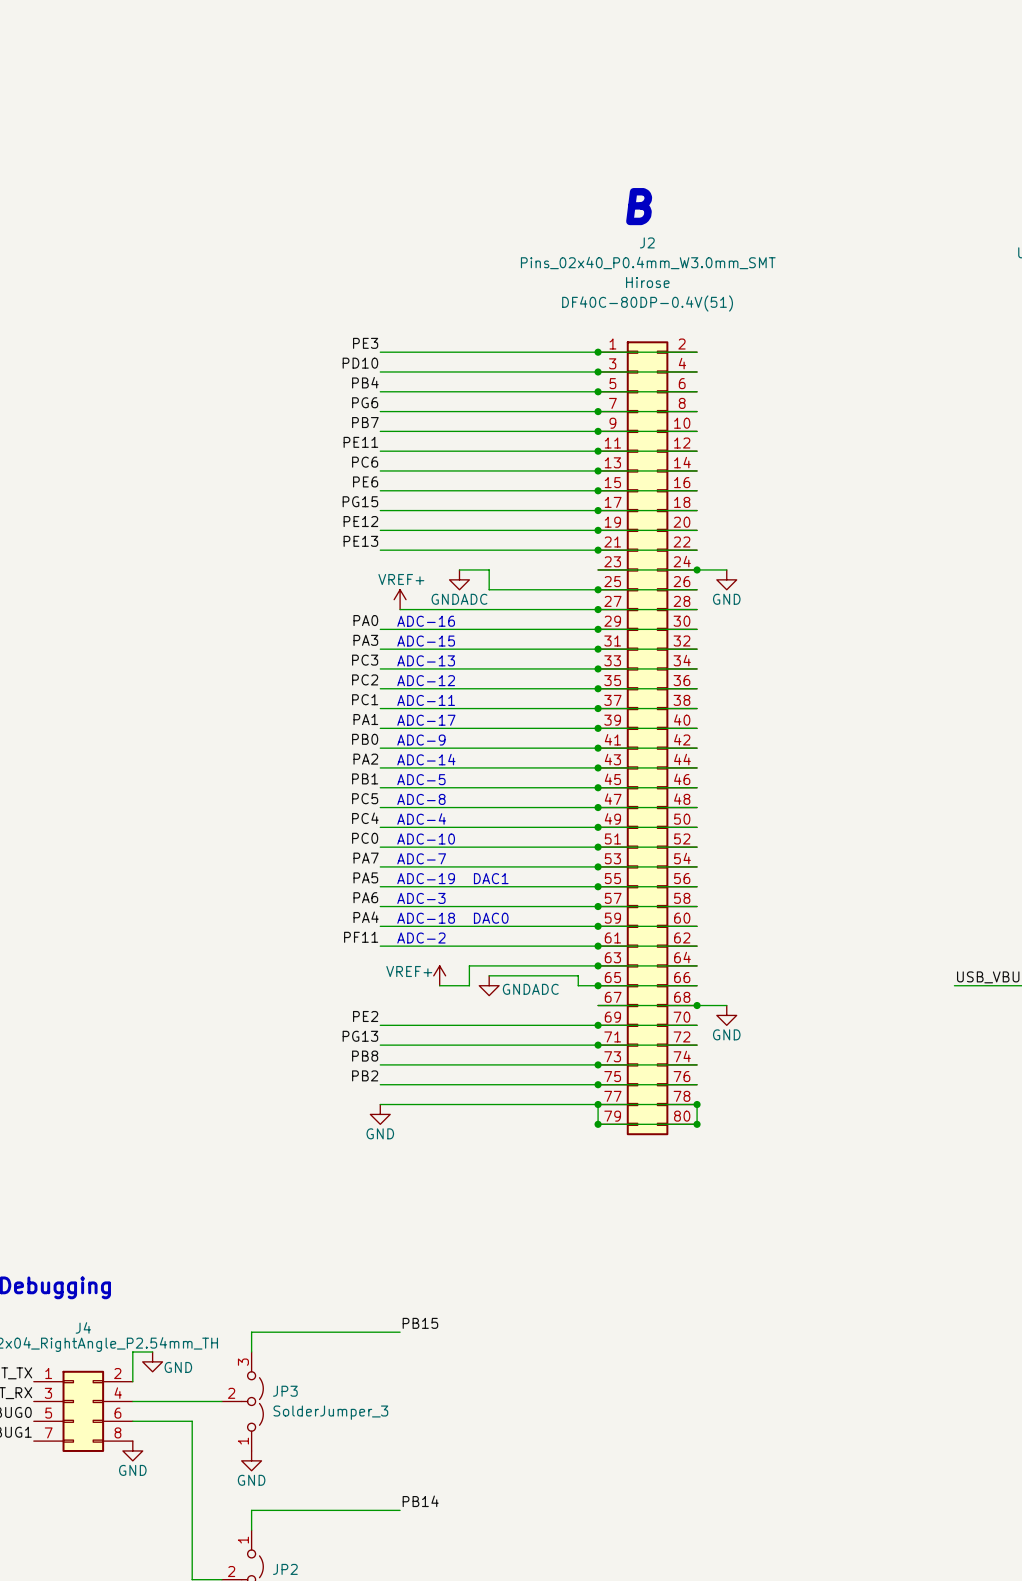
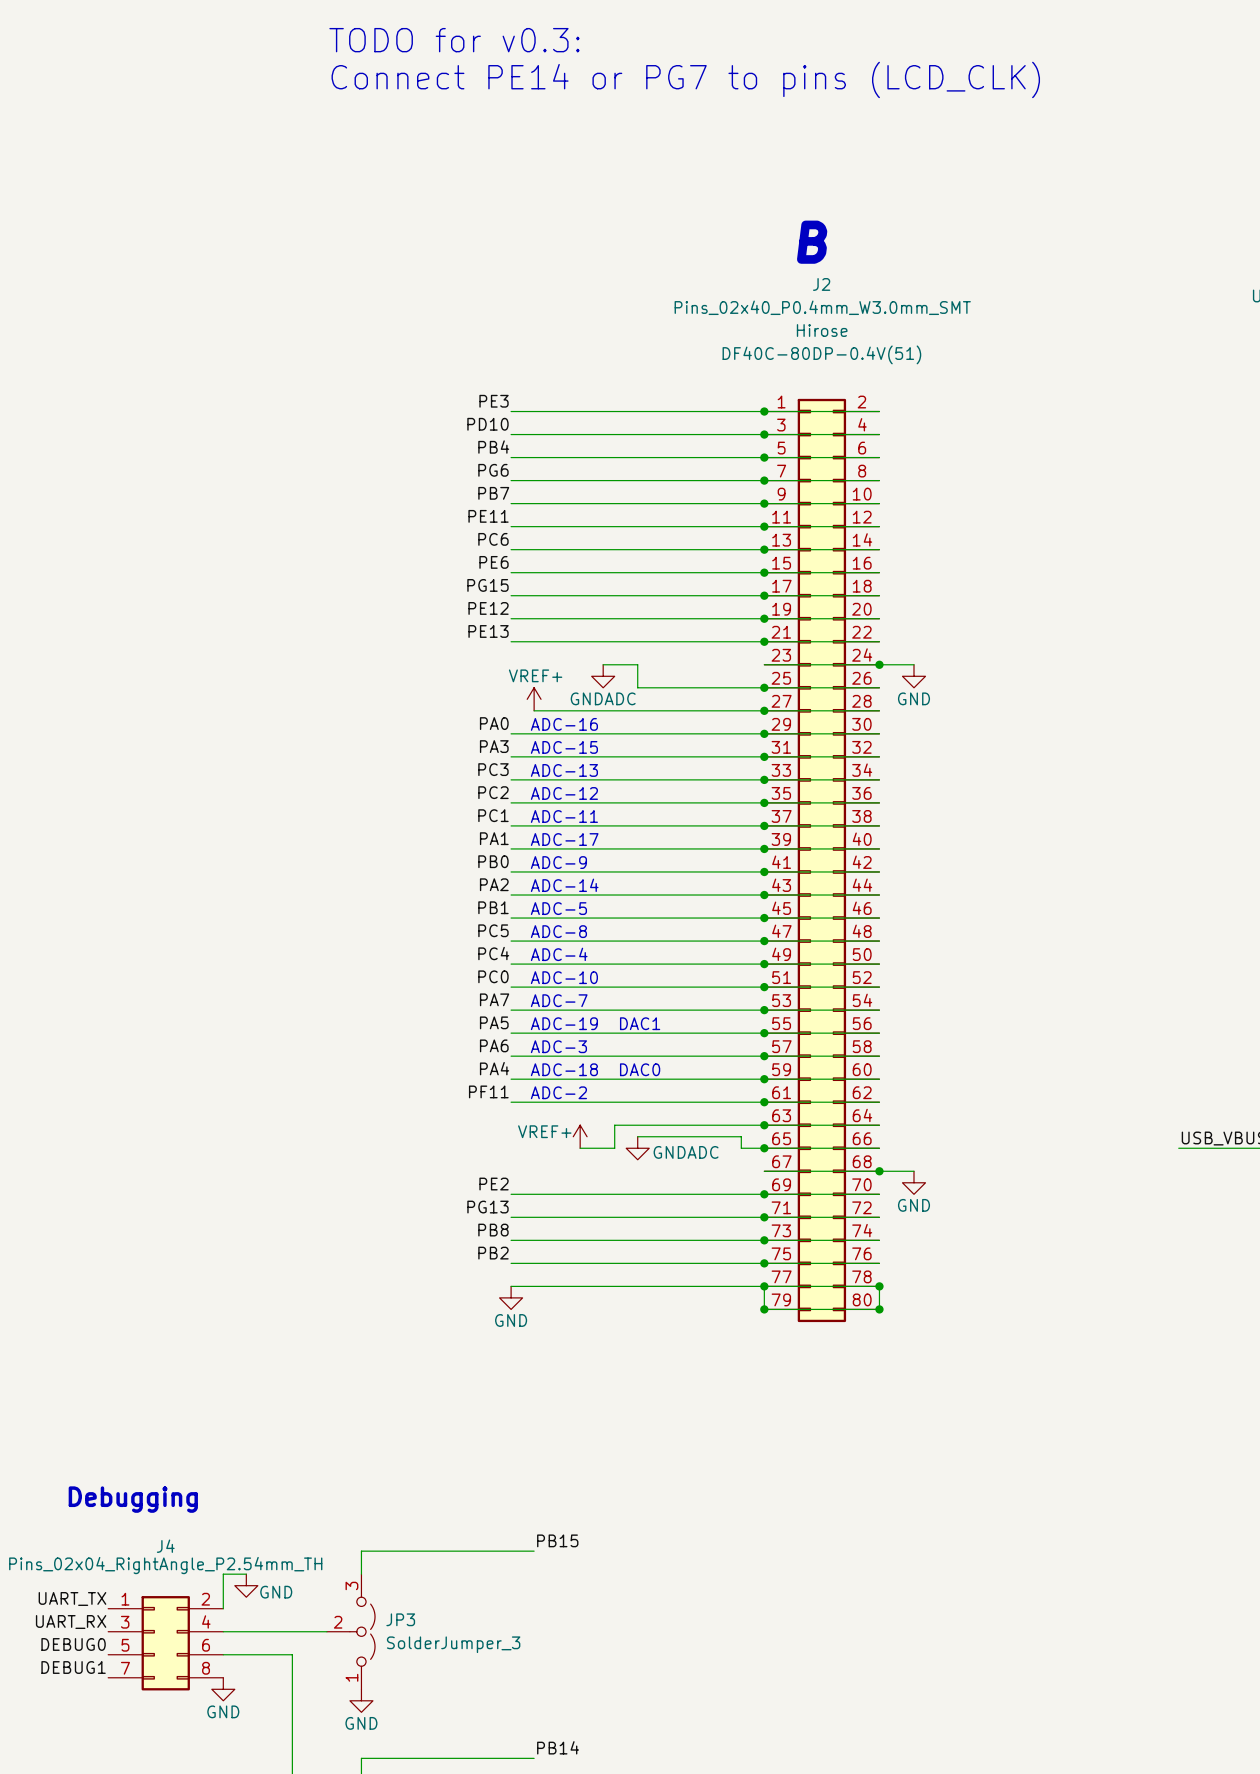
text: none -> TODO for v0.3: (454, 40)
text: none -> Connect PE14 or PG7 to pins (LCD_CLK) (685, 79)

